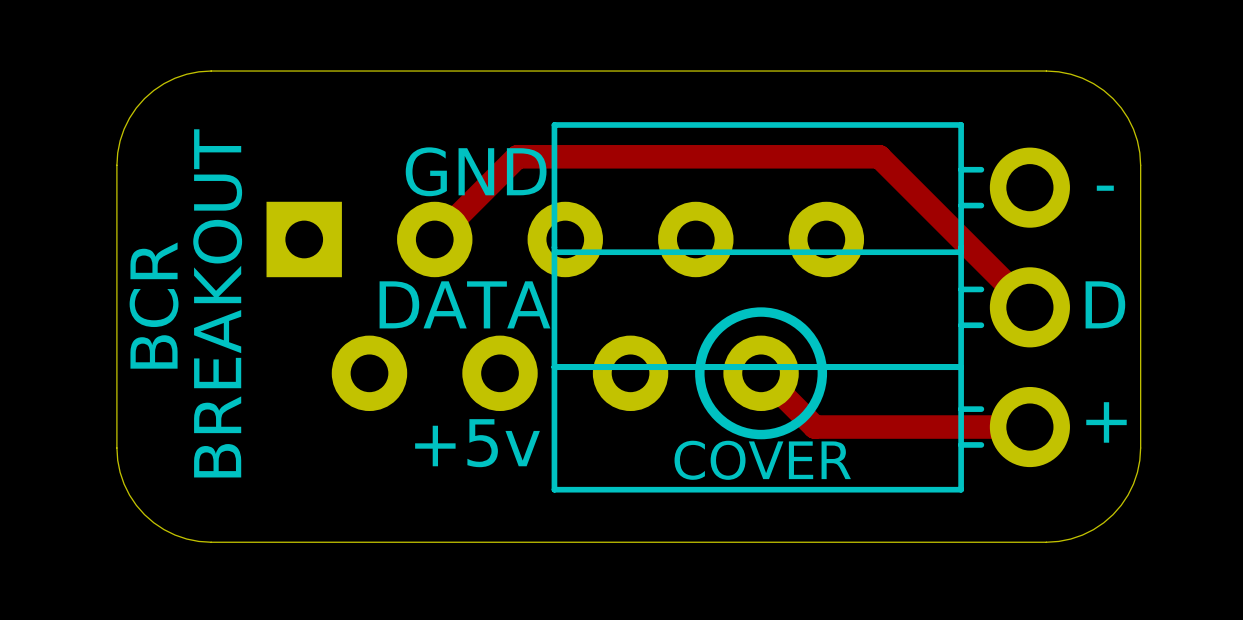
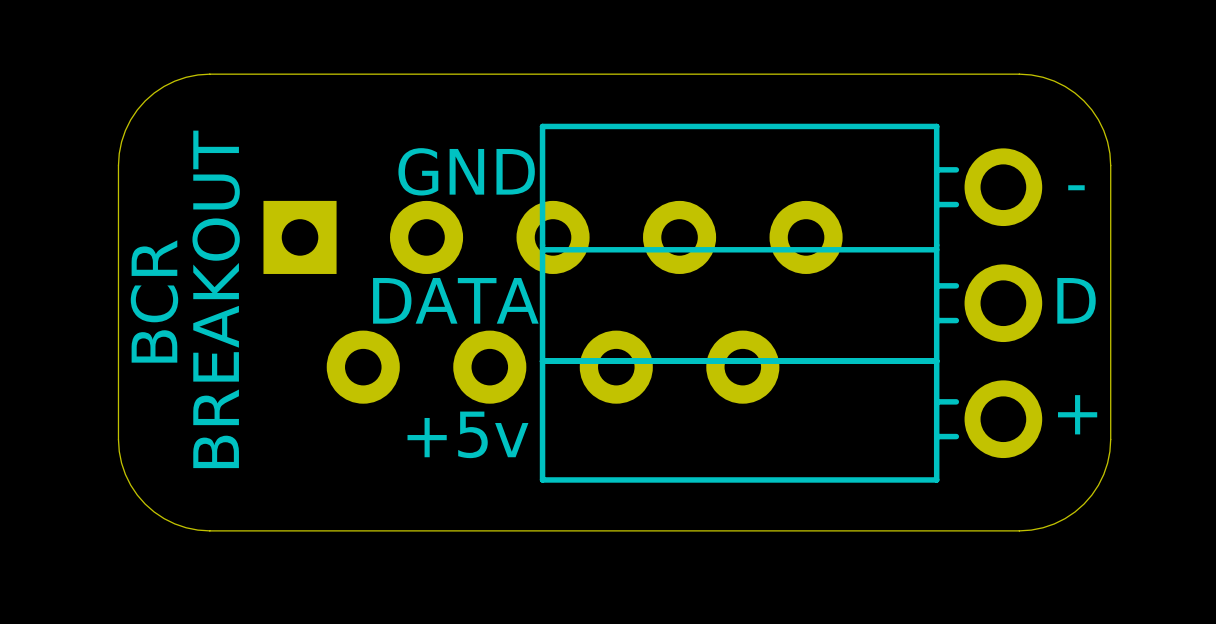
track: (434, 239) (517, 156) (879, 156) (1029, 307) -> none
drawing: [695, 307, 828, 440] -> none
track: (761, 373) (814, 427) (1029, 427) -> none
text: COVER (762, 460) -> none

